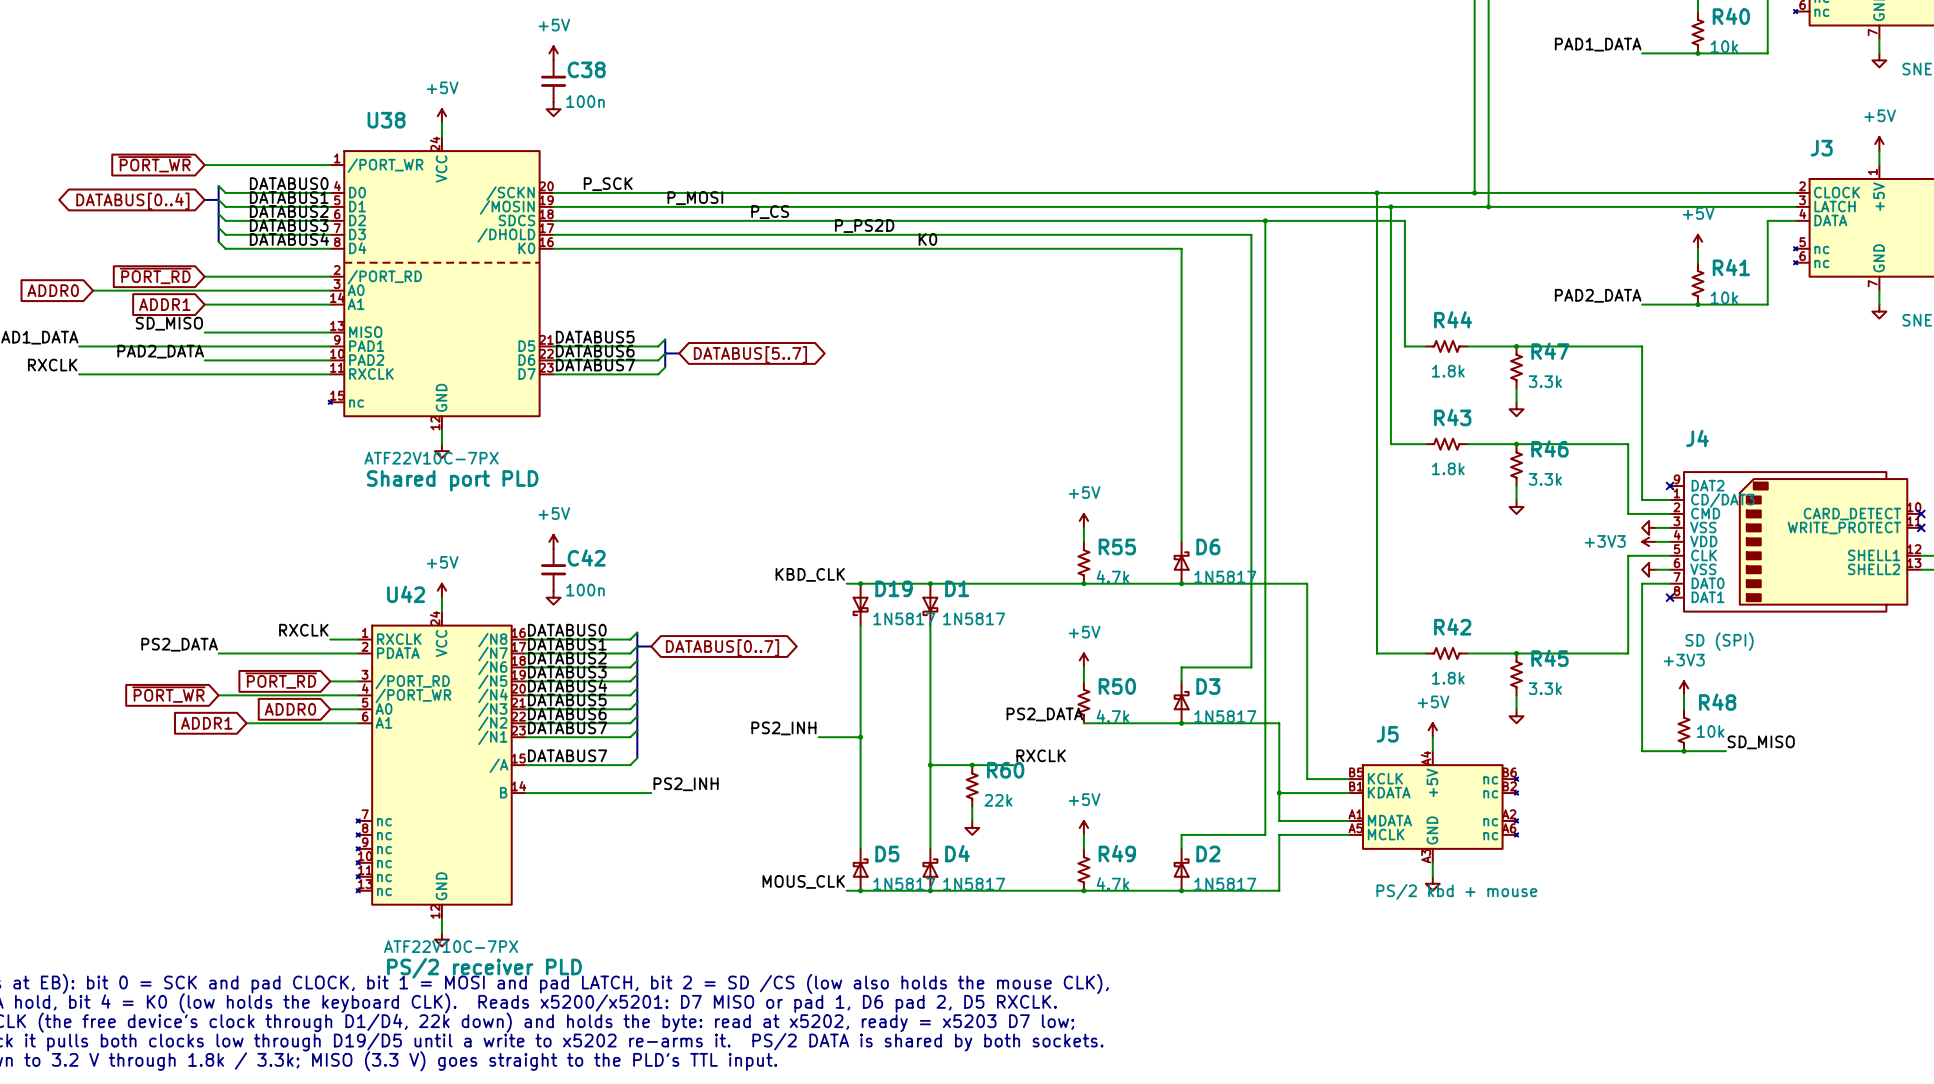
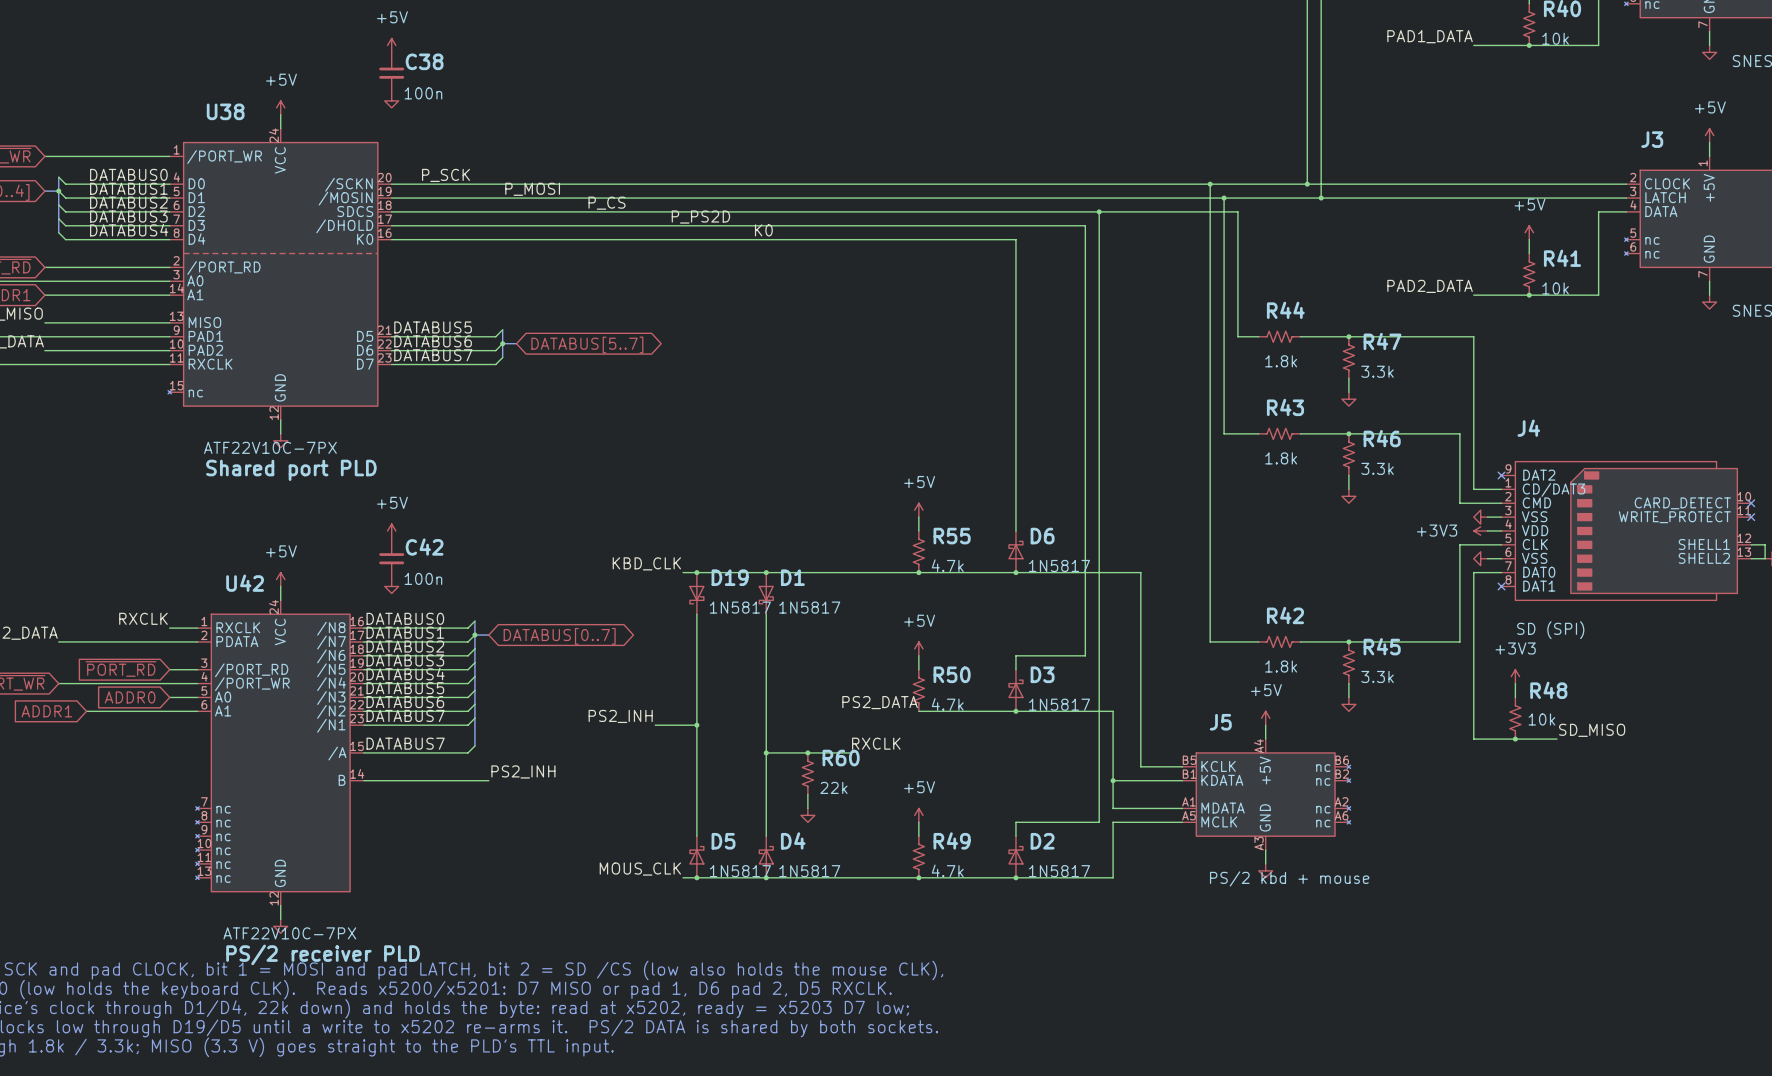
junction: none -> (58, 191)
junction: none -> (502, 343)
junction: none -> (474, 635)

